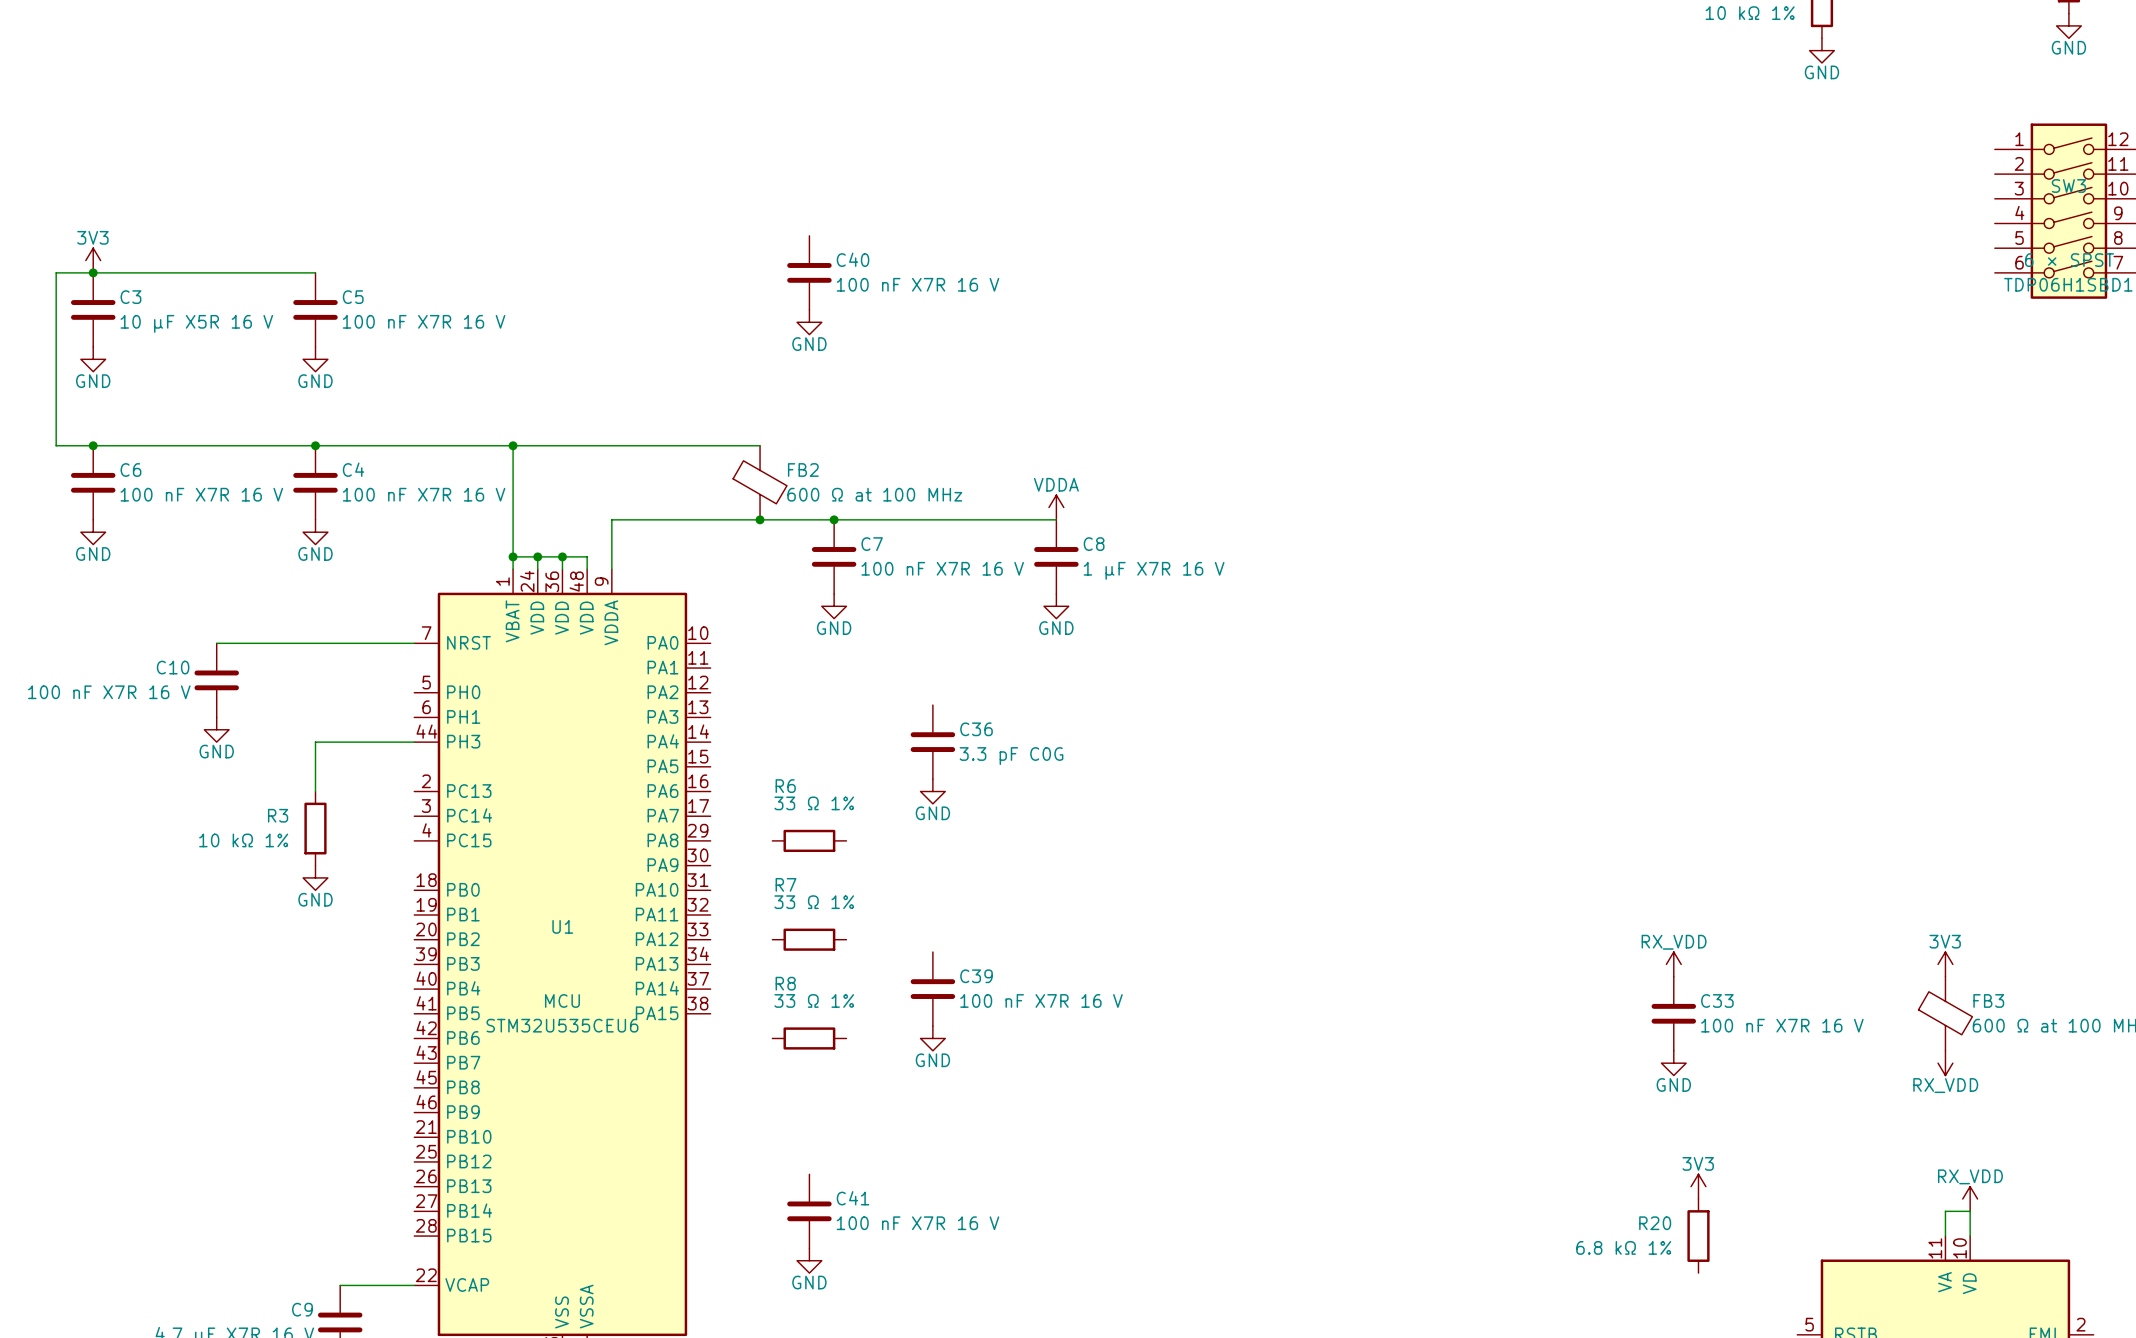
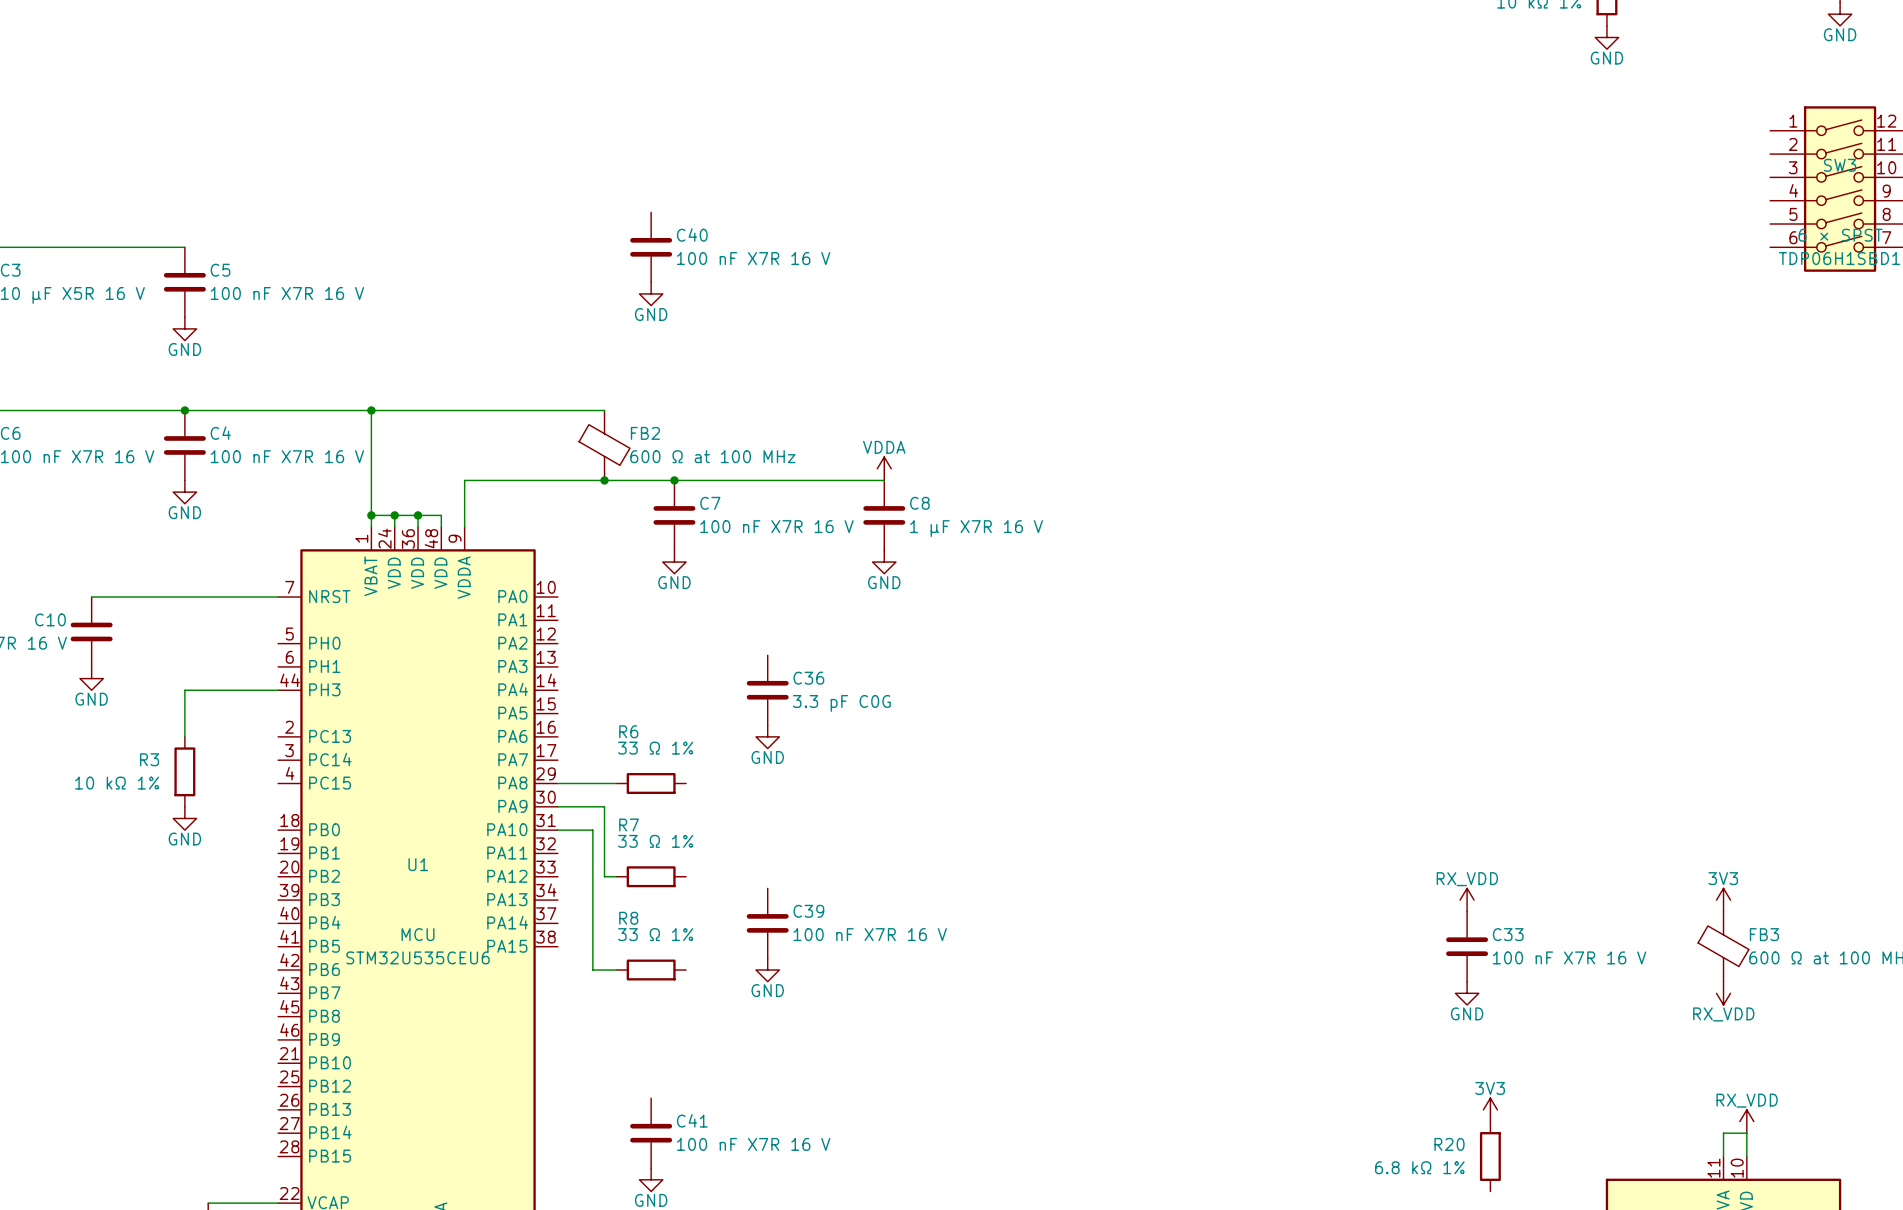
wire: none -> (557, 783) (616, 783)
wire: none -> (557, 806) (604, 806) (604, 876) (616, 876)
wire: none -> (557, 830) (592, 830) (592, 970) (616, 970)

